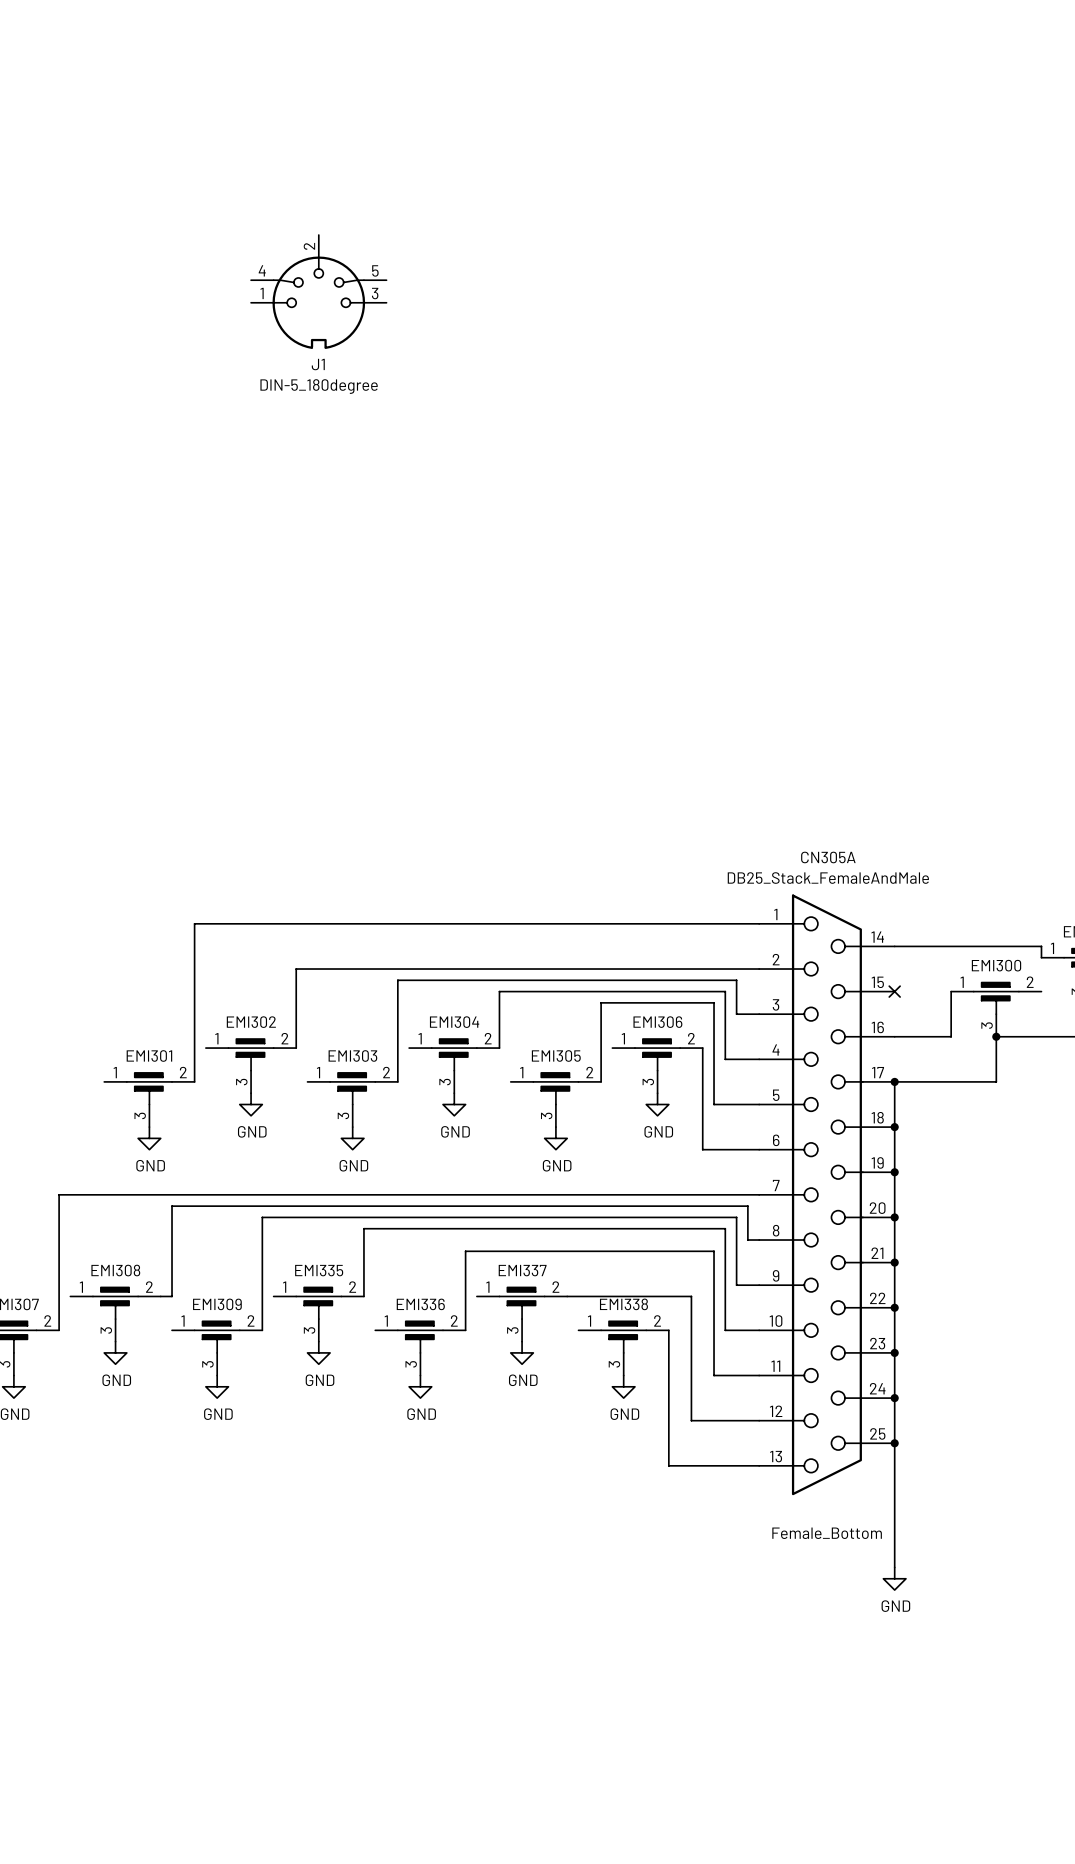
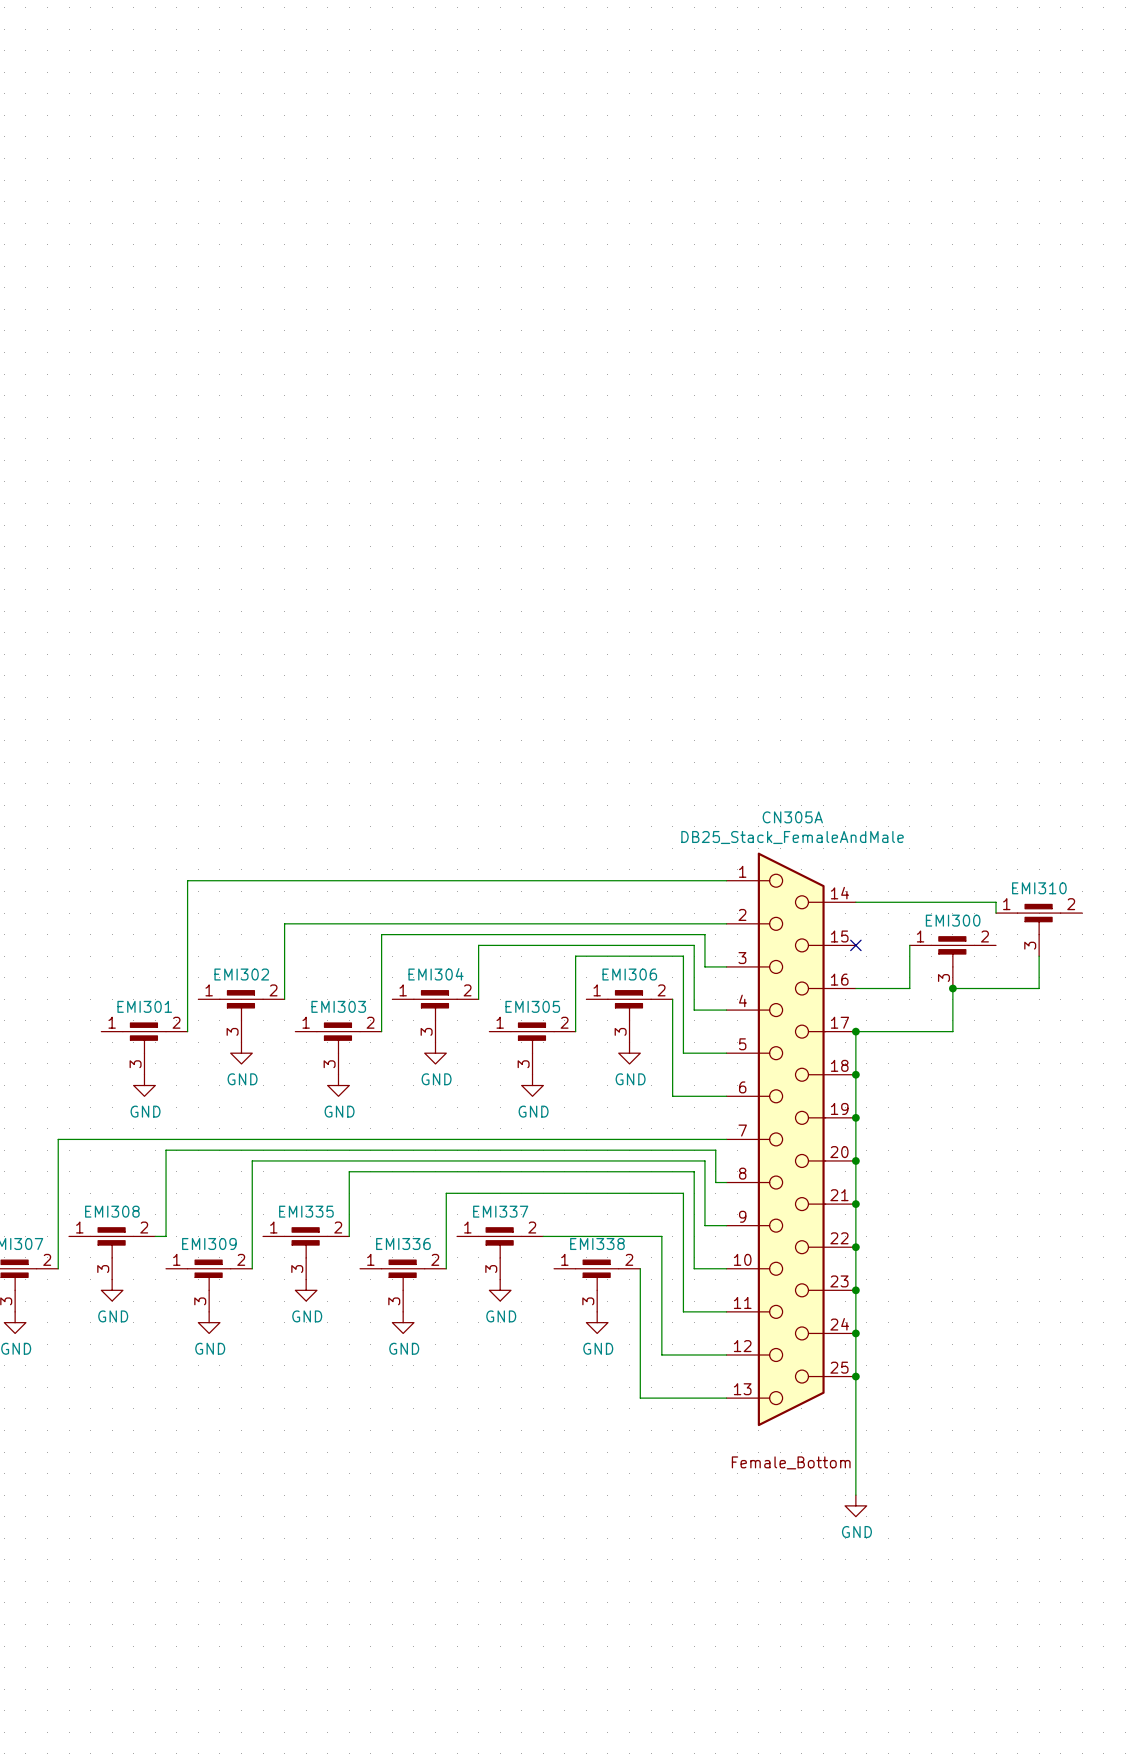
J1: DIN-5_180degree (318, 292) -> none

